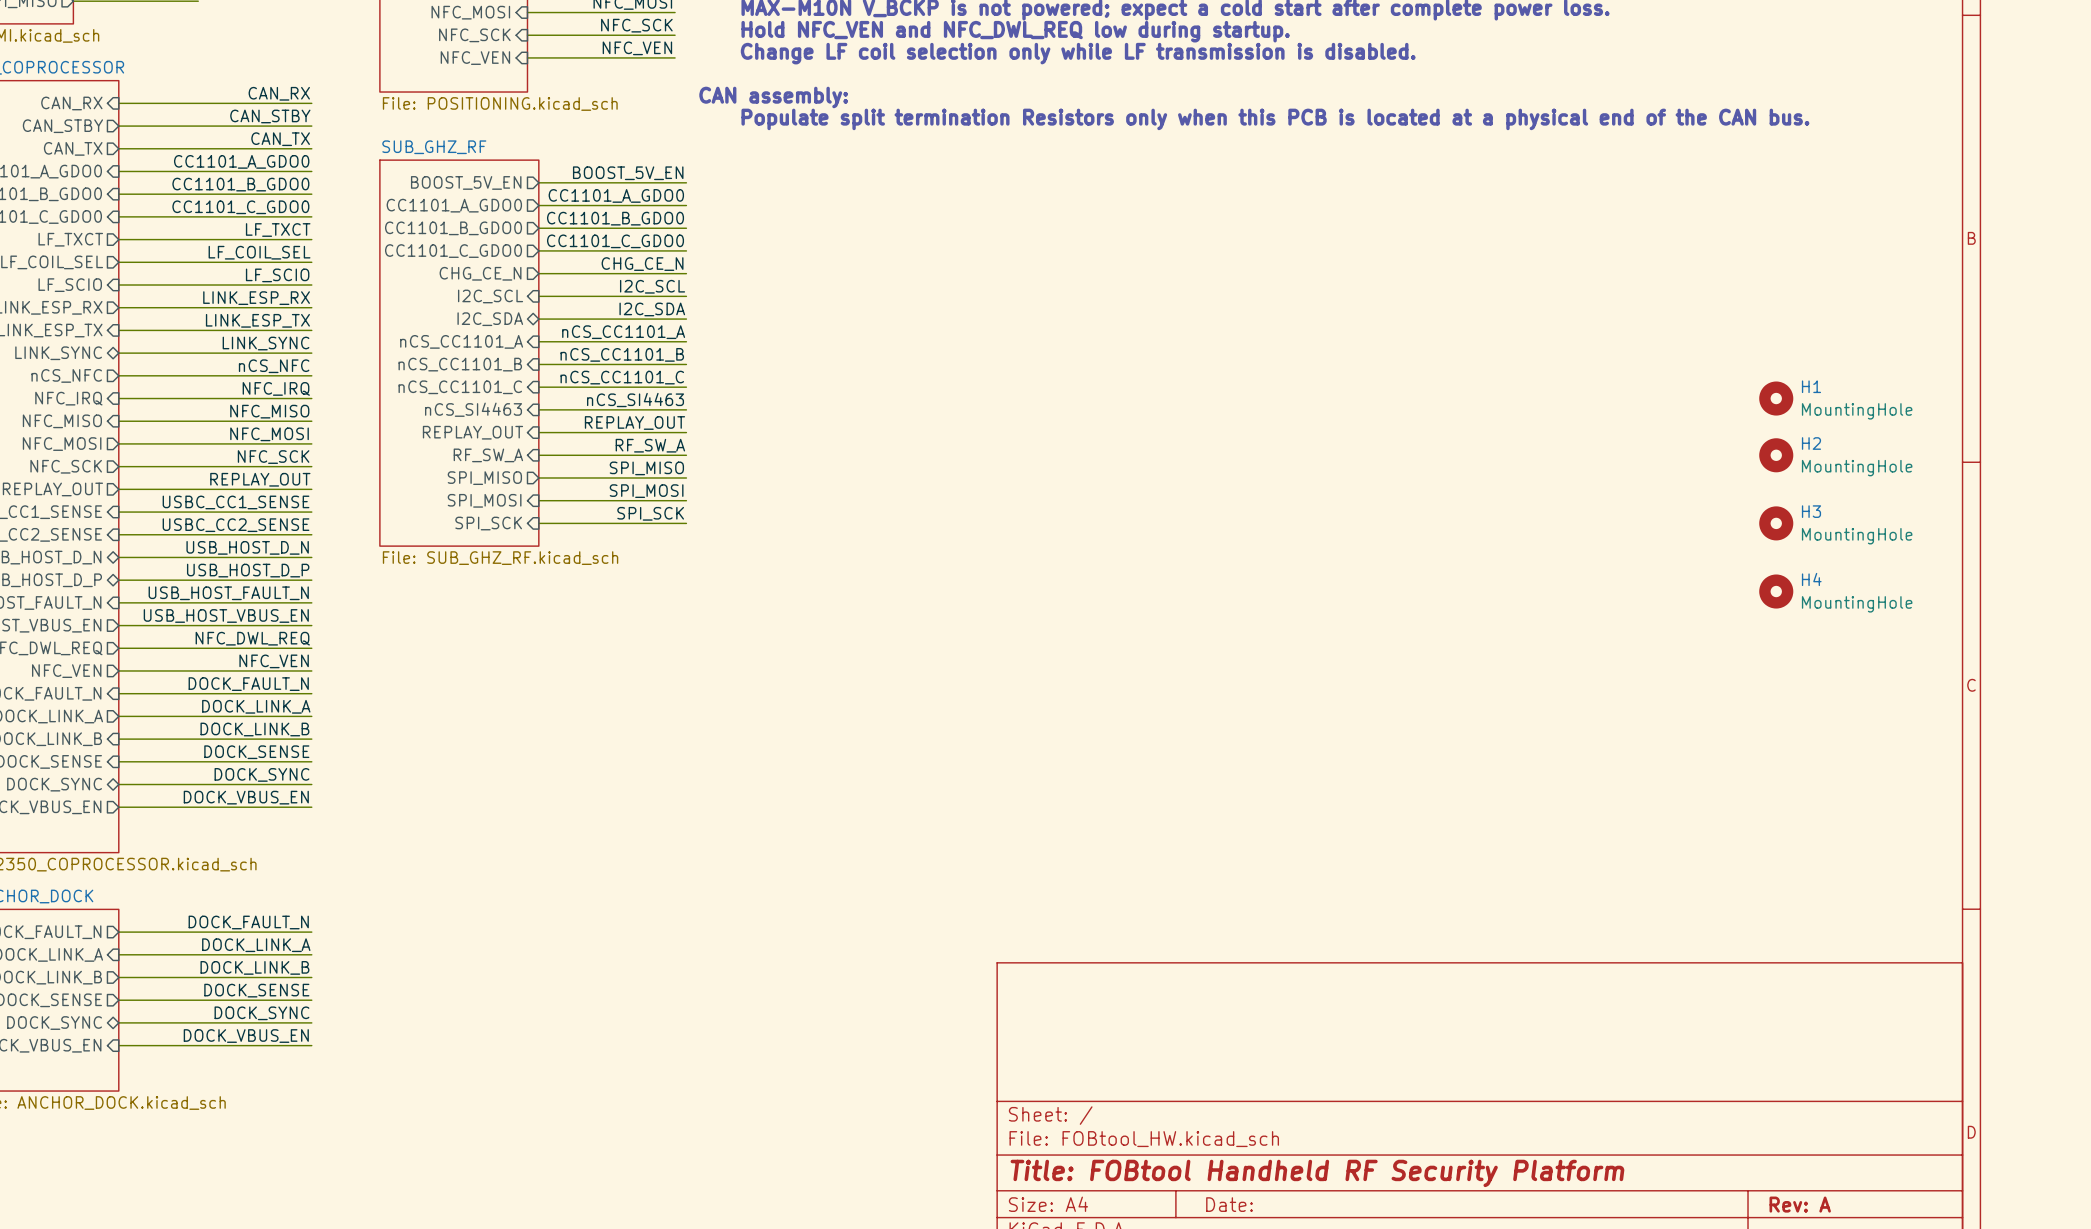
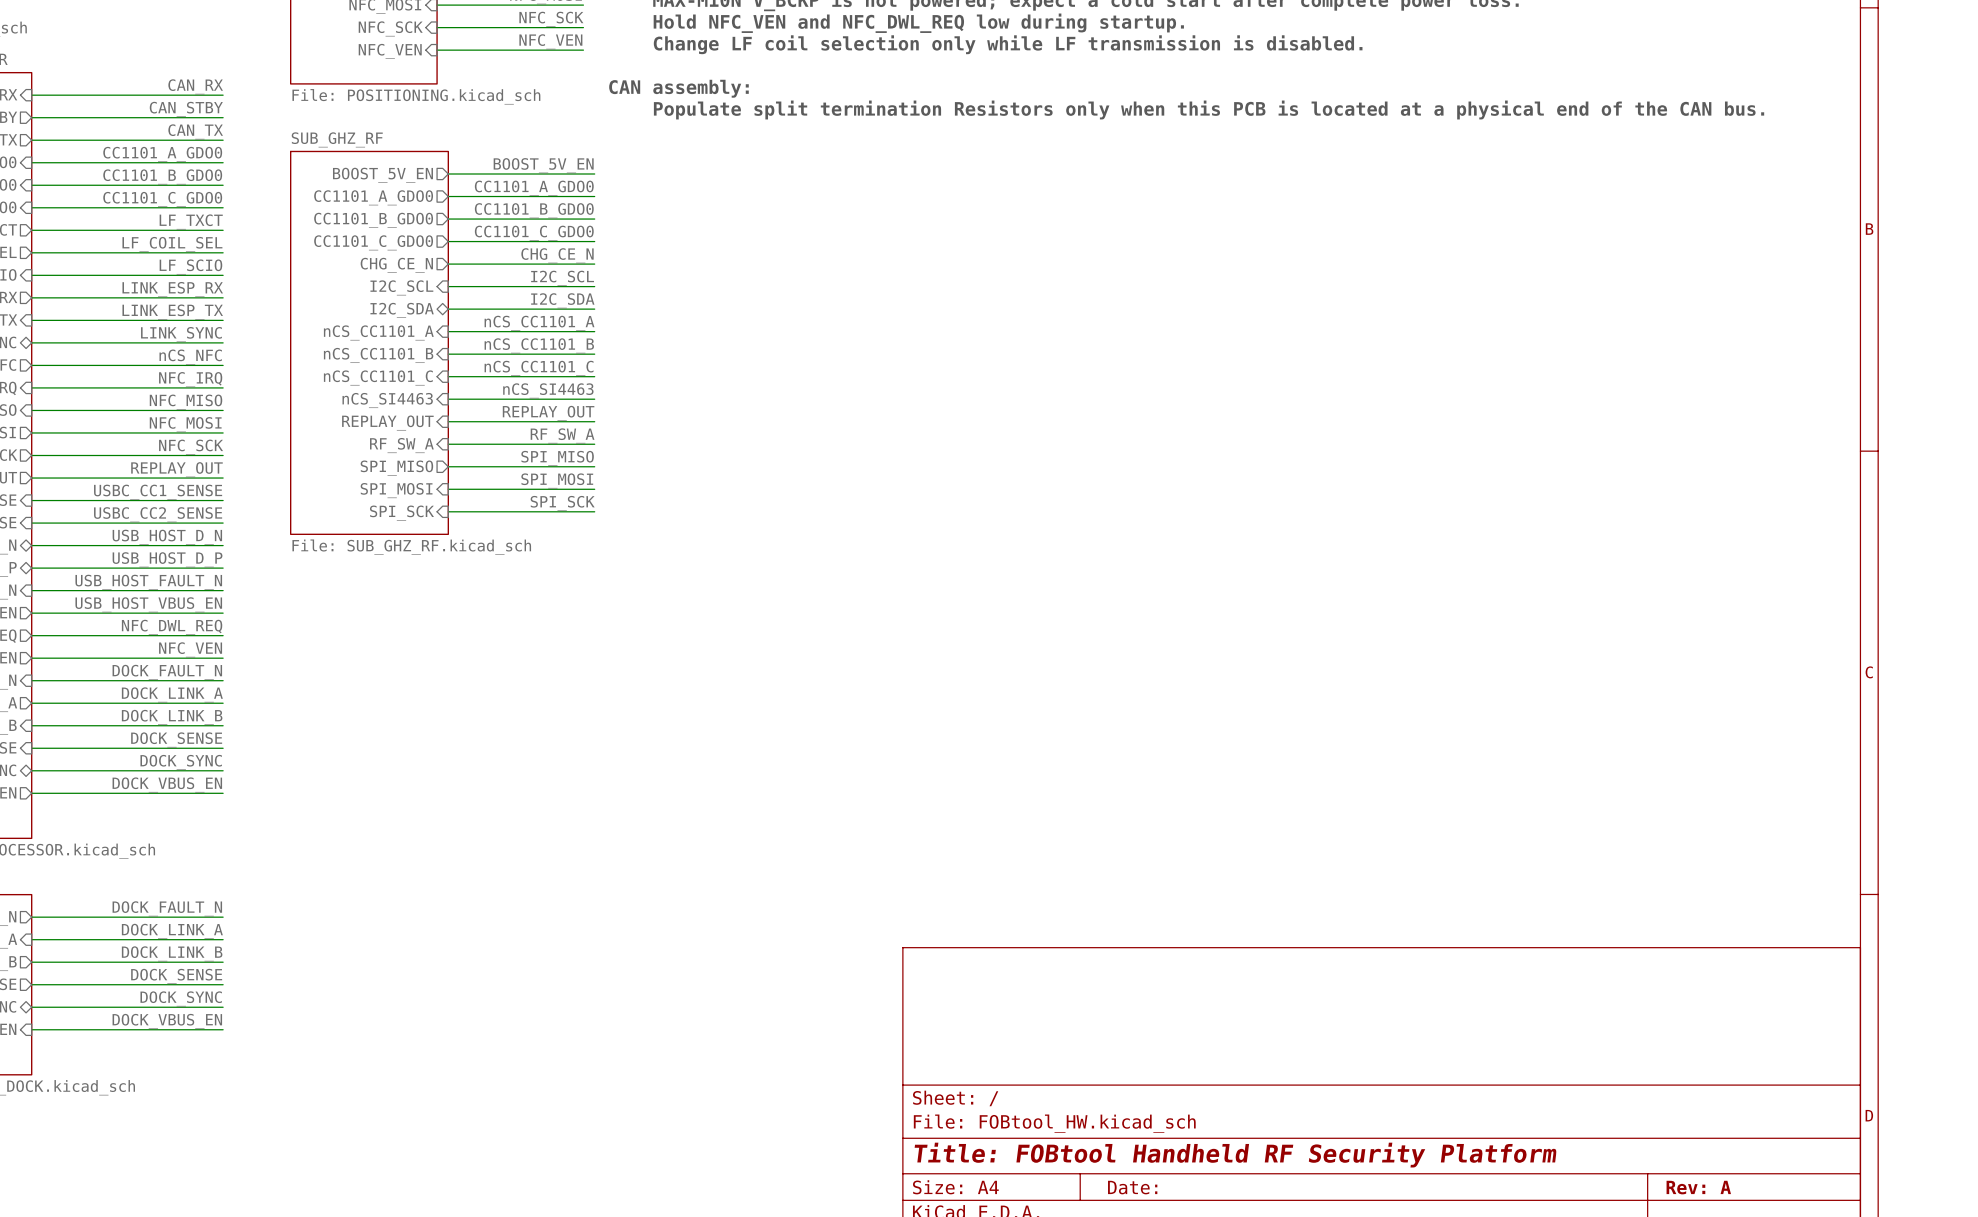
H1: MountingHole (1776, 398) -> none
H2: MountingHole (1776, 455) -> none
H3: MountingHole (1776, 523) -> none
H4: MountingHole (1776, 591) -> none

